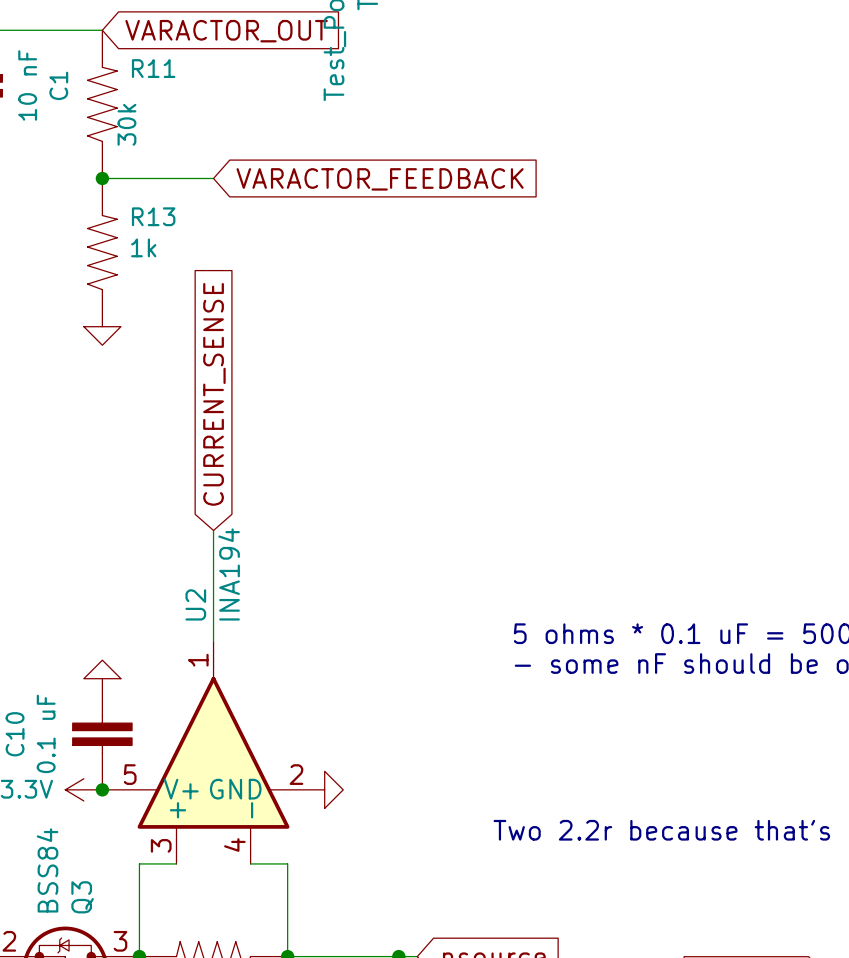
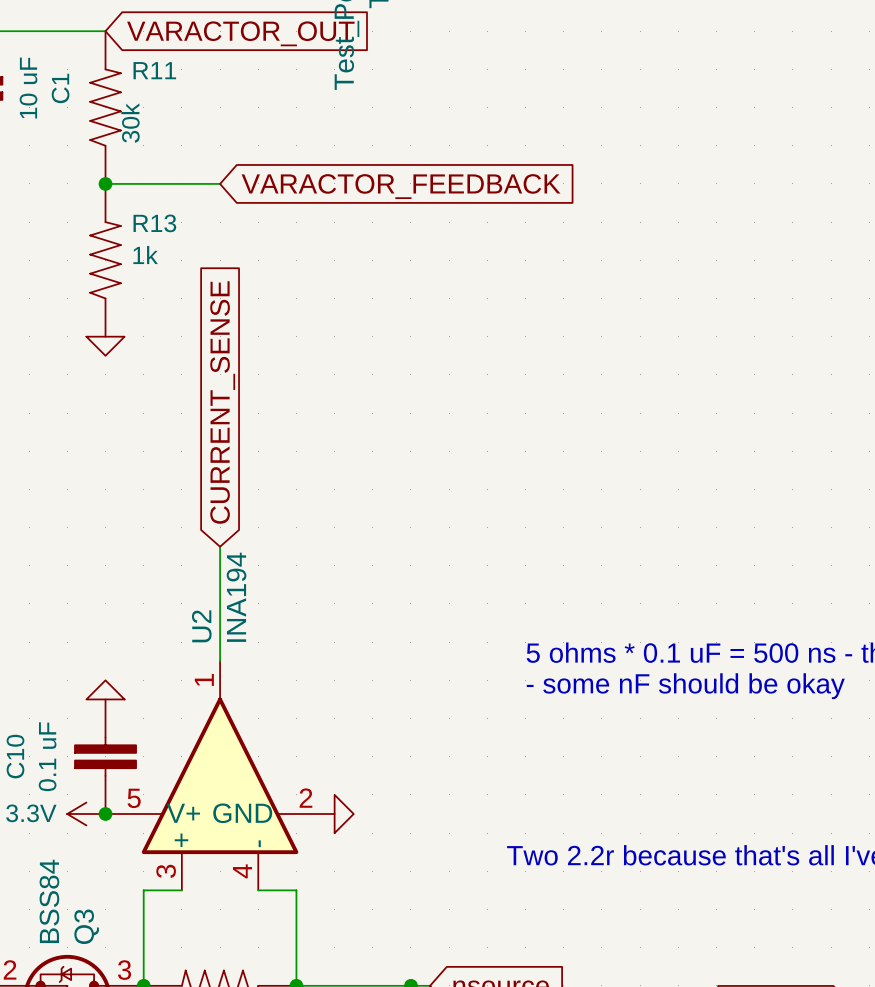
C1 value: 10 nF (27, 85) -> 10 uF (28, 88)

